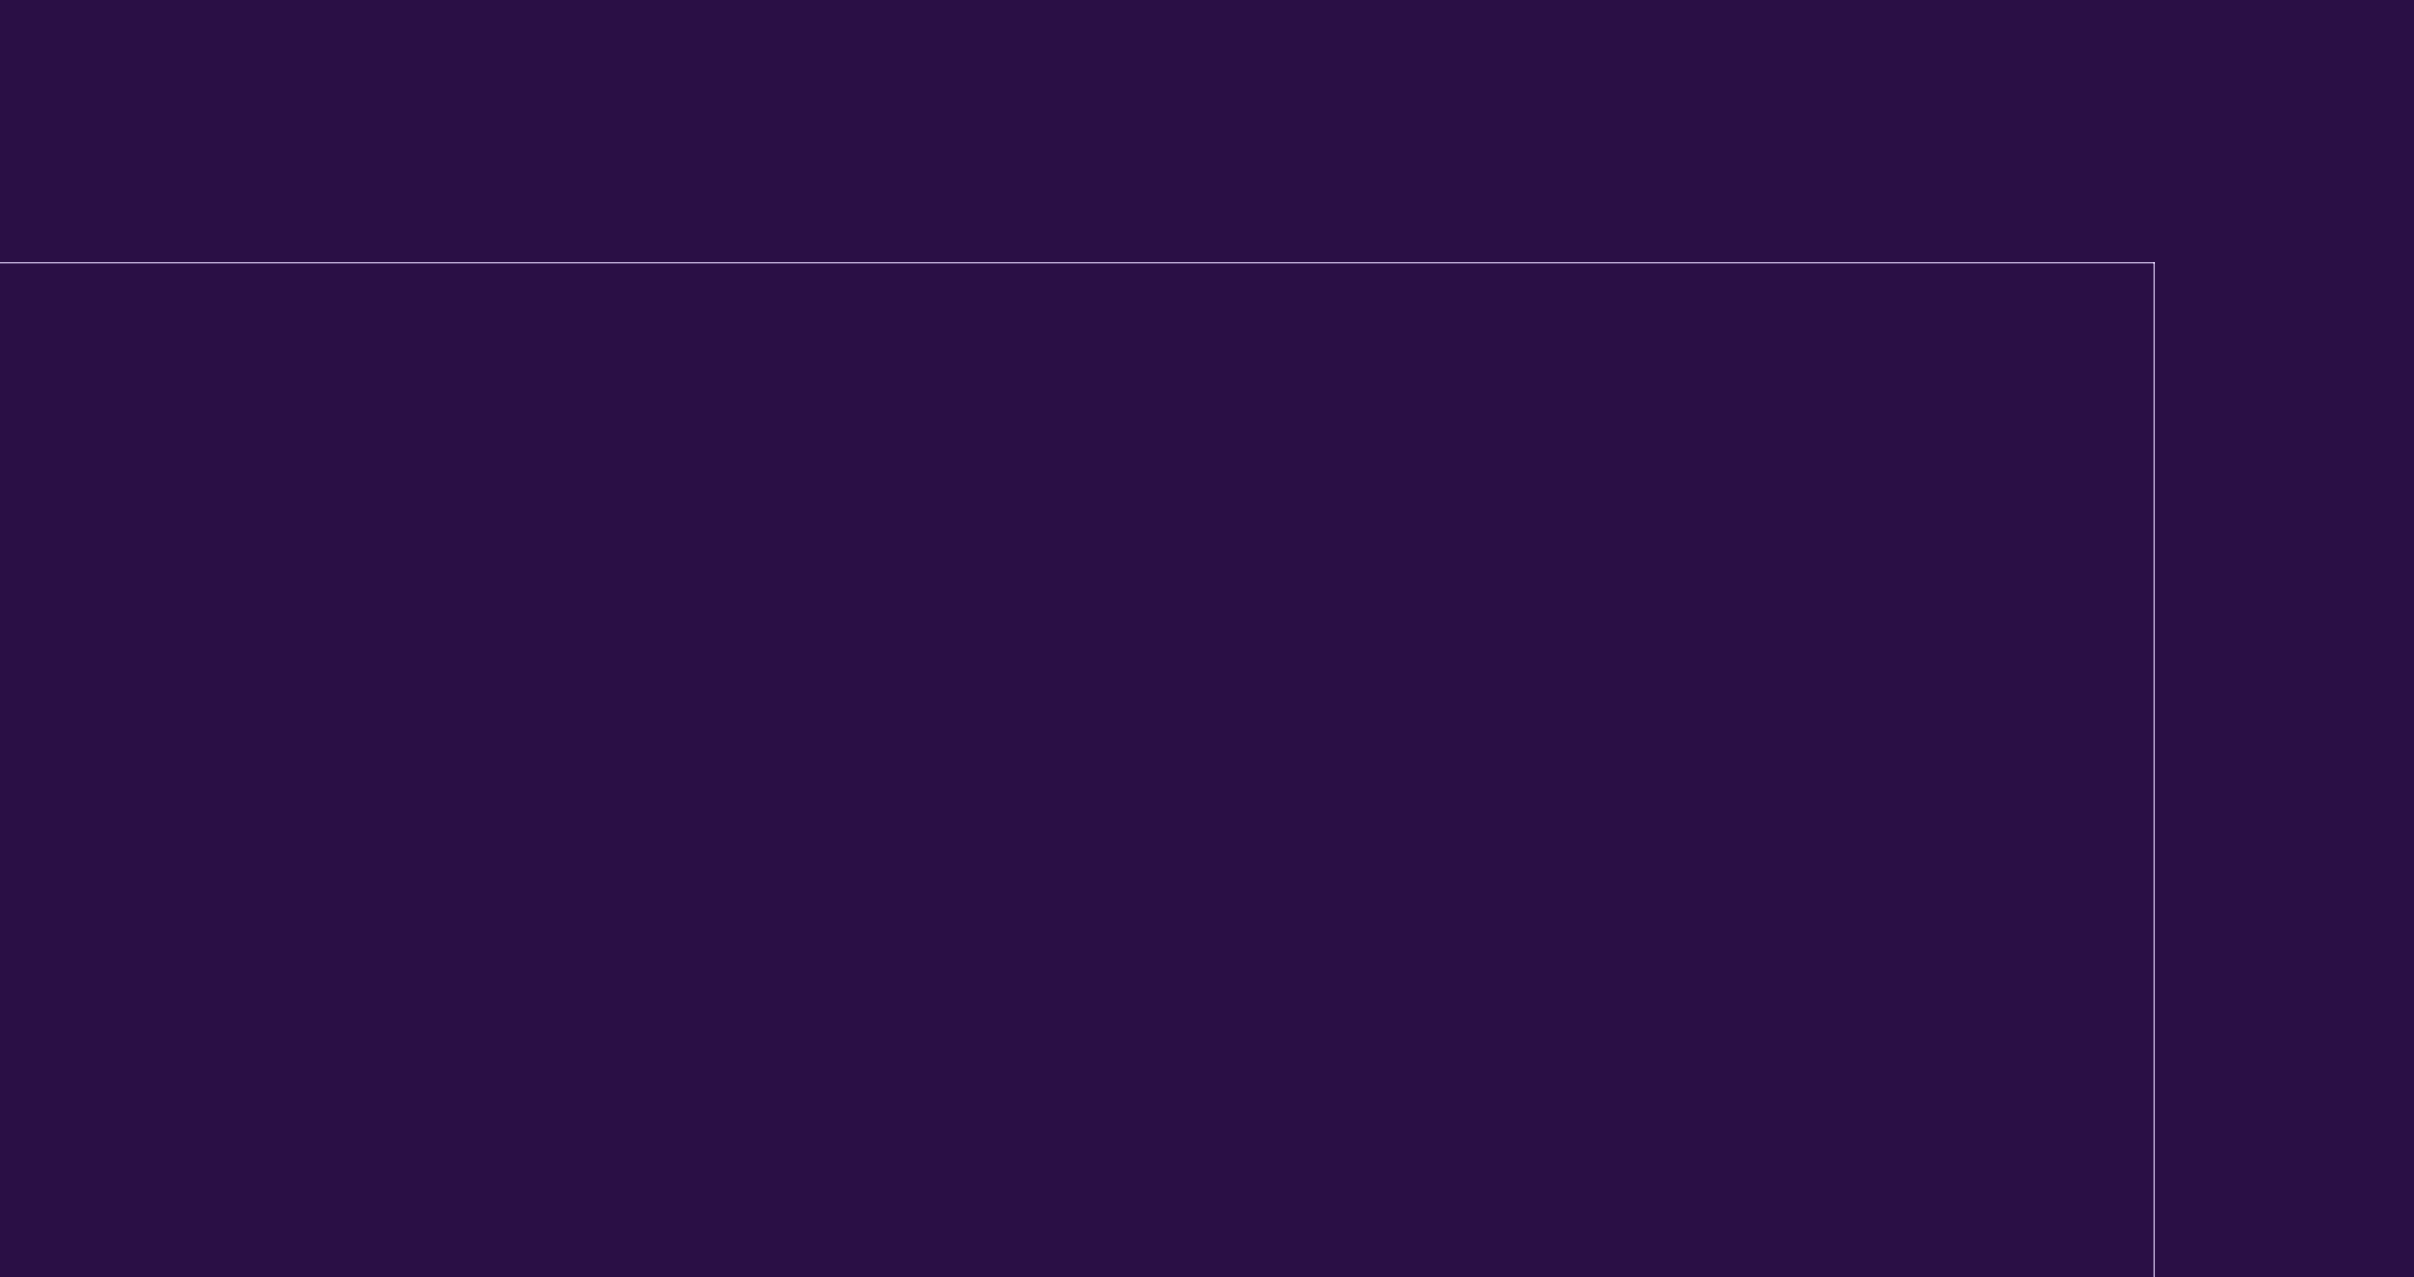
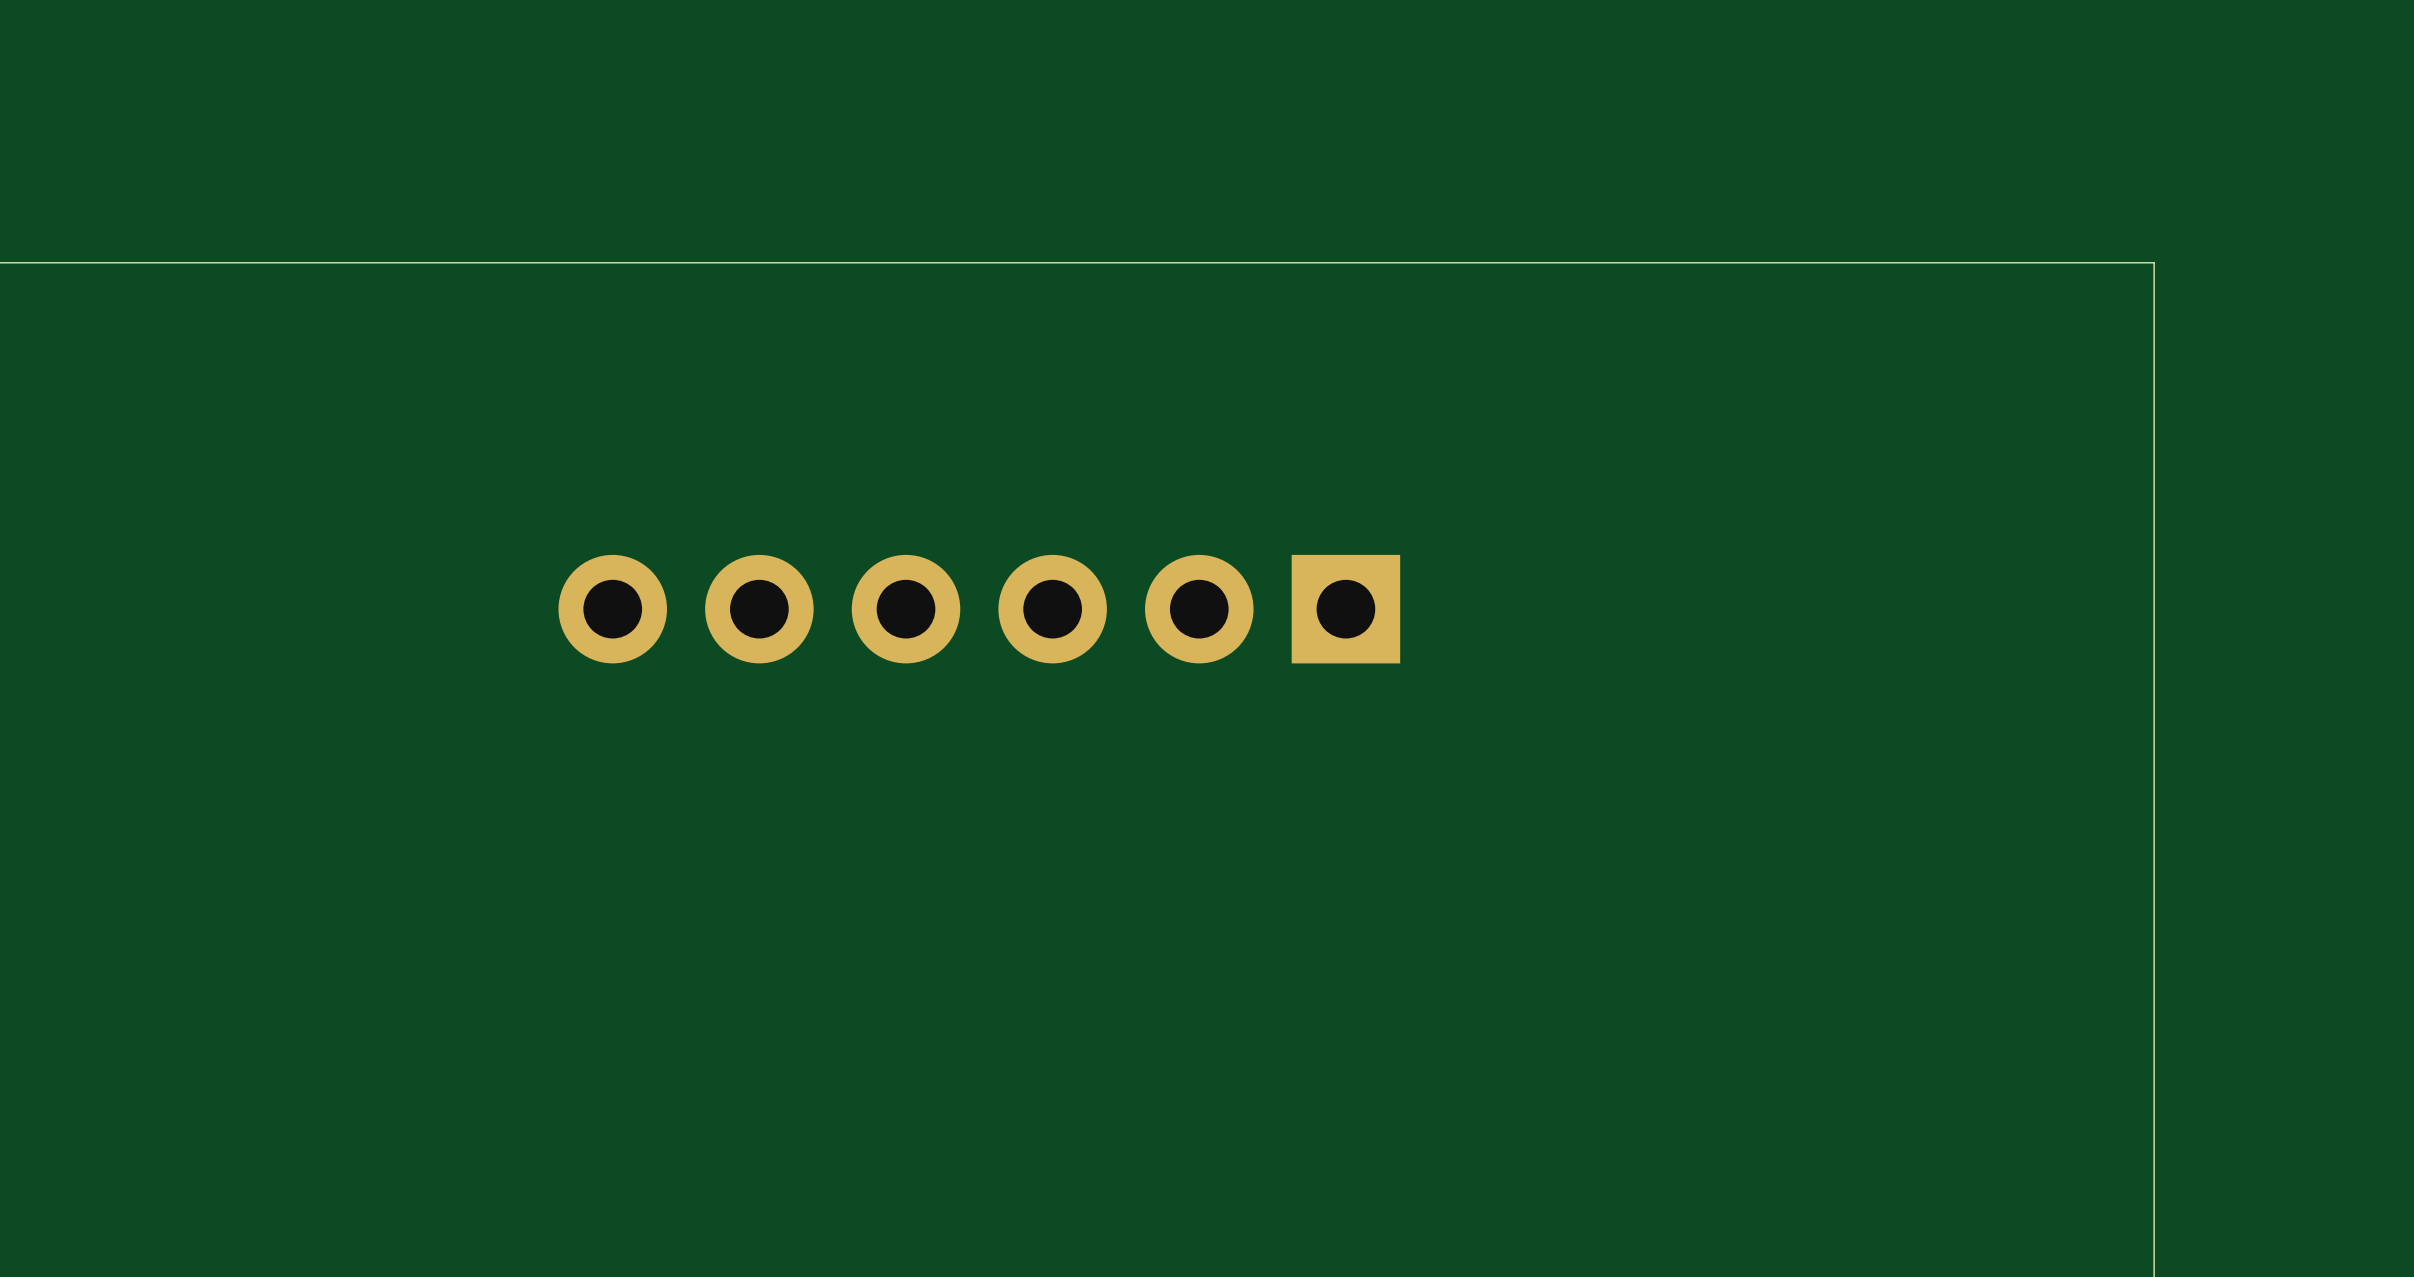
part: none -> (979, 609)

